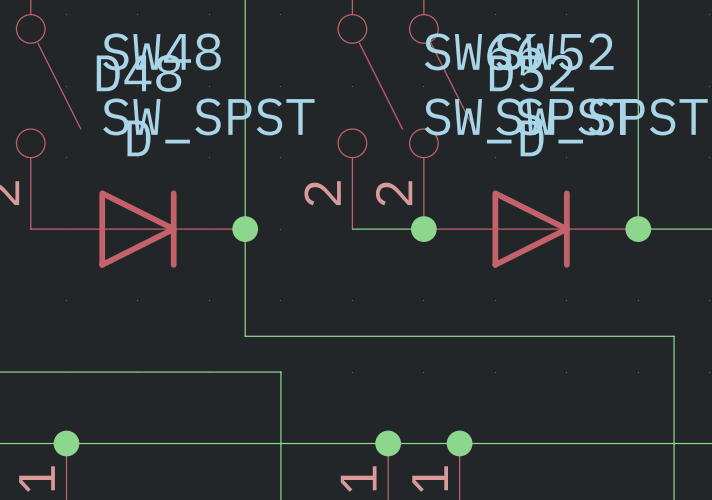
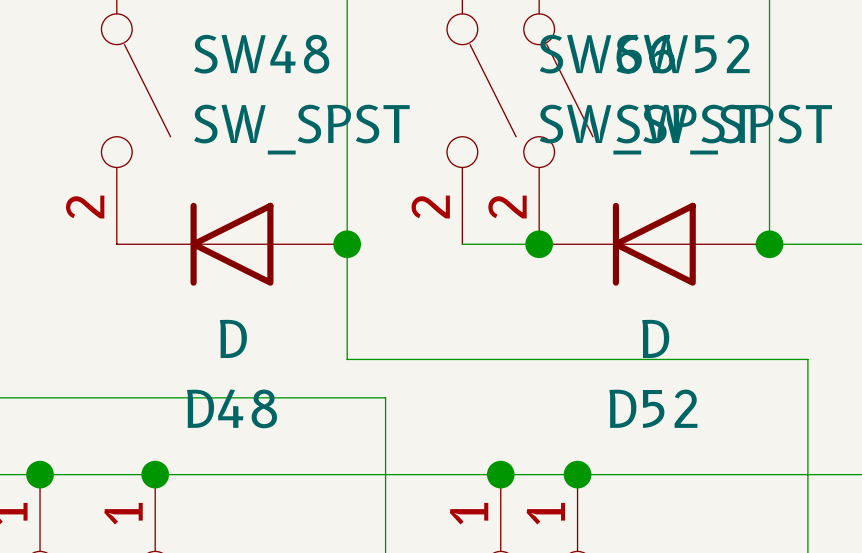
D48 rotation: 0° (137, 229) -> 180° (231, 244)
D52 rotation: 0° (531, 229) -> 180° (654, 244)

